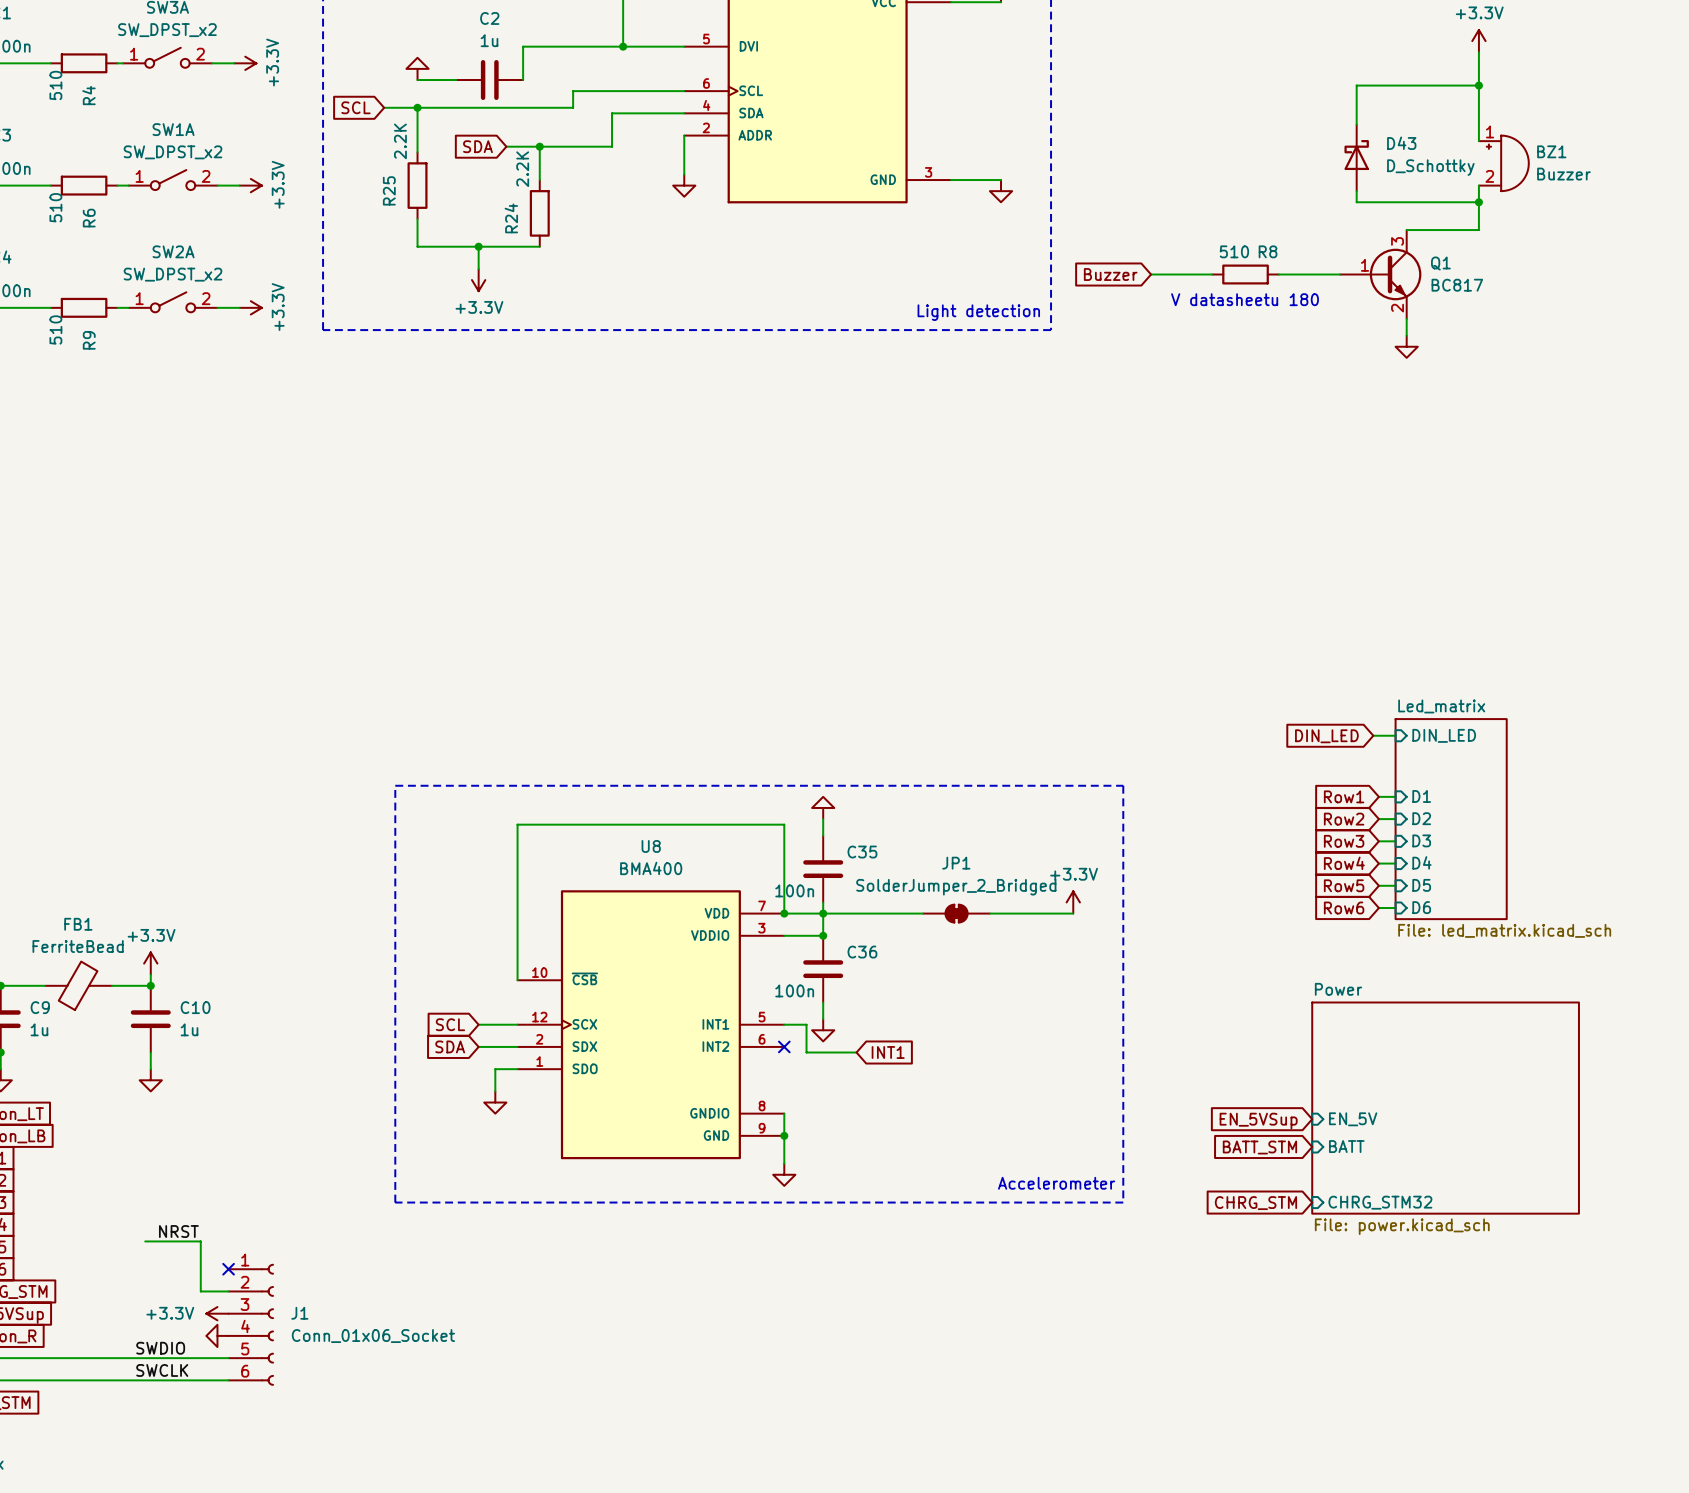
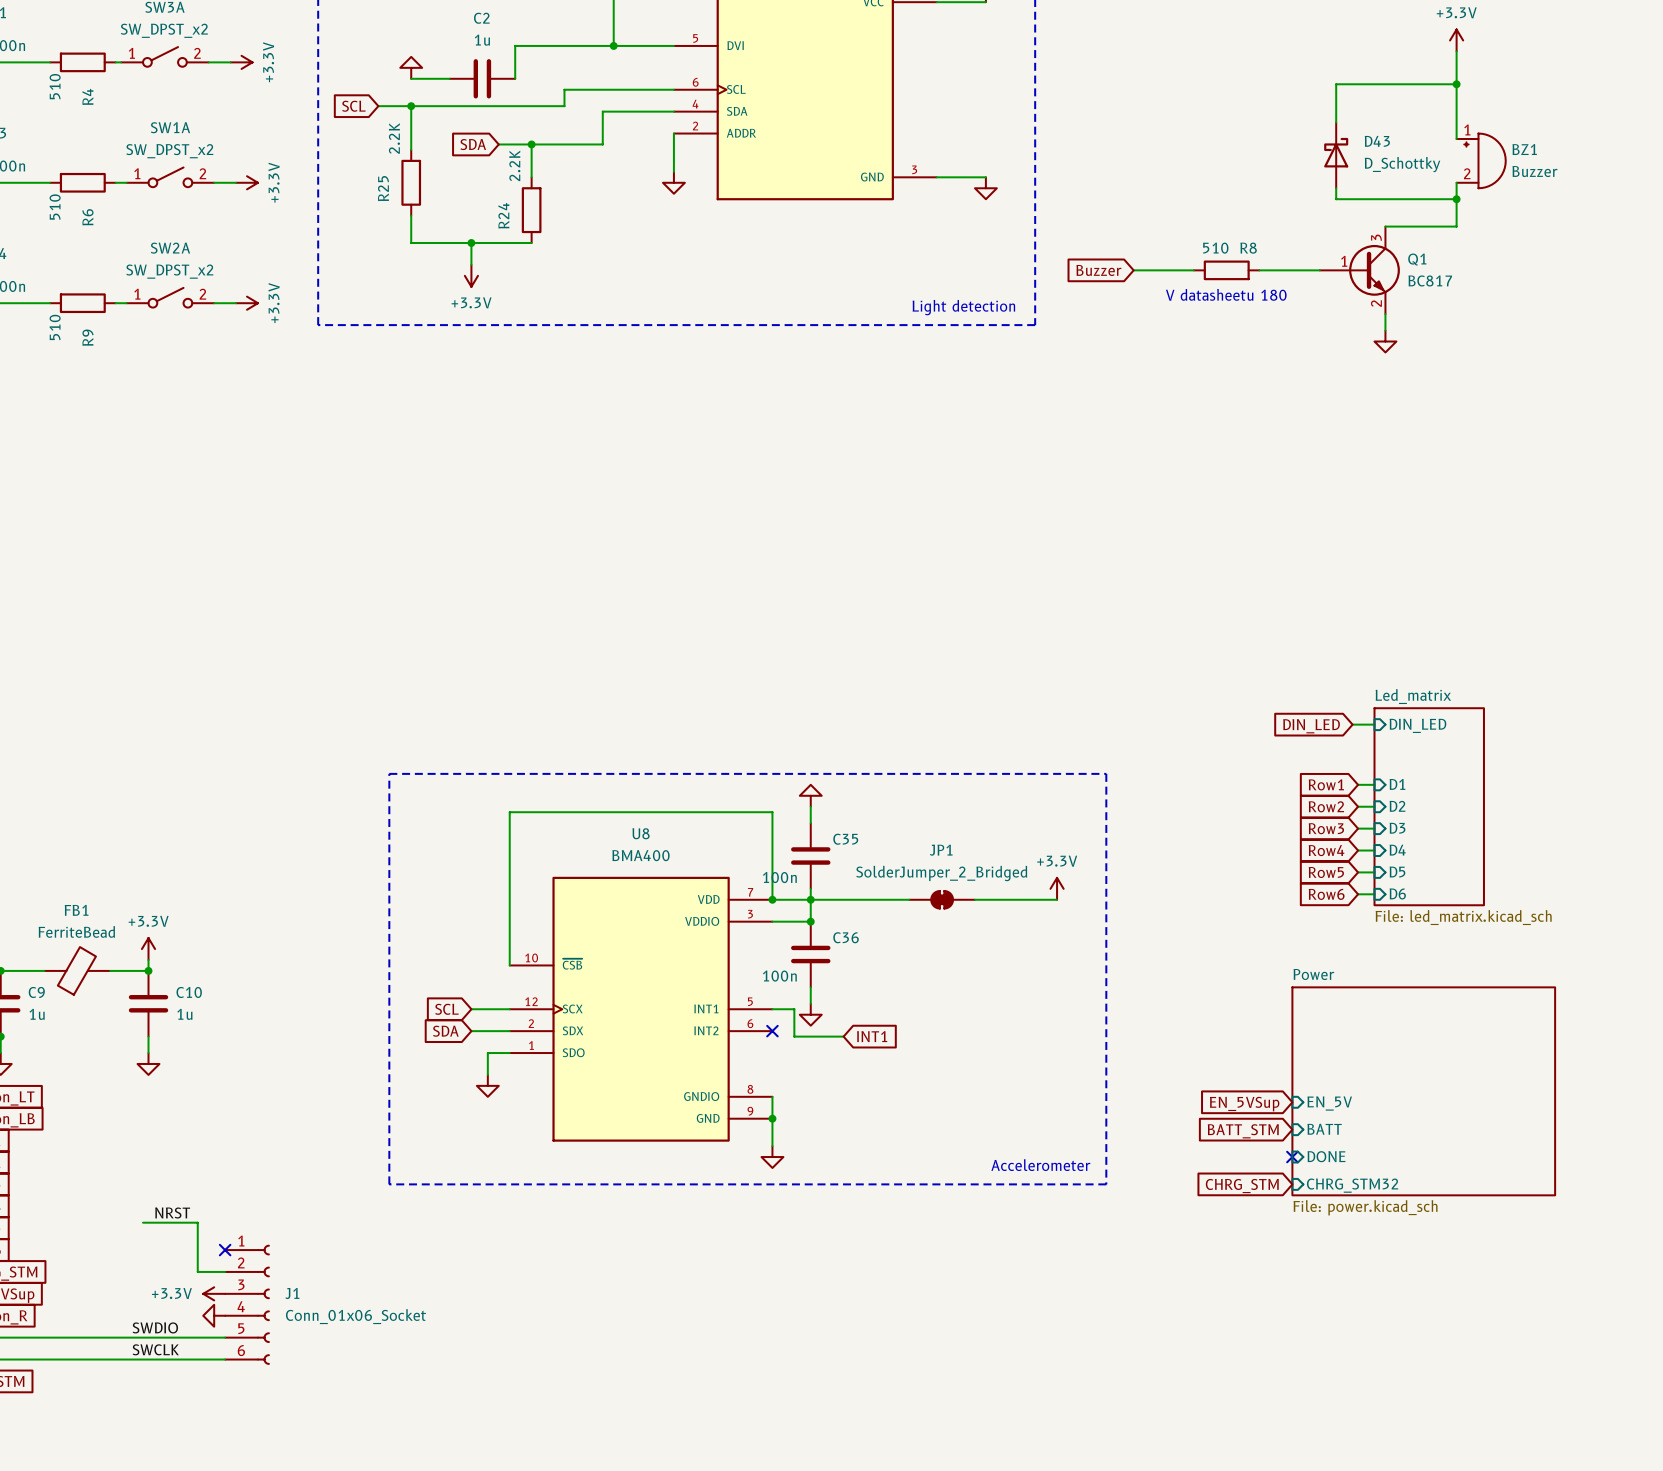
no-connect mark: none -> (1292, 1157)
sheet pin: none -> DONE (1326, 1156)

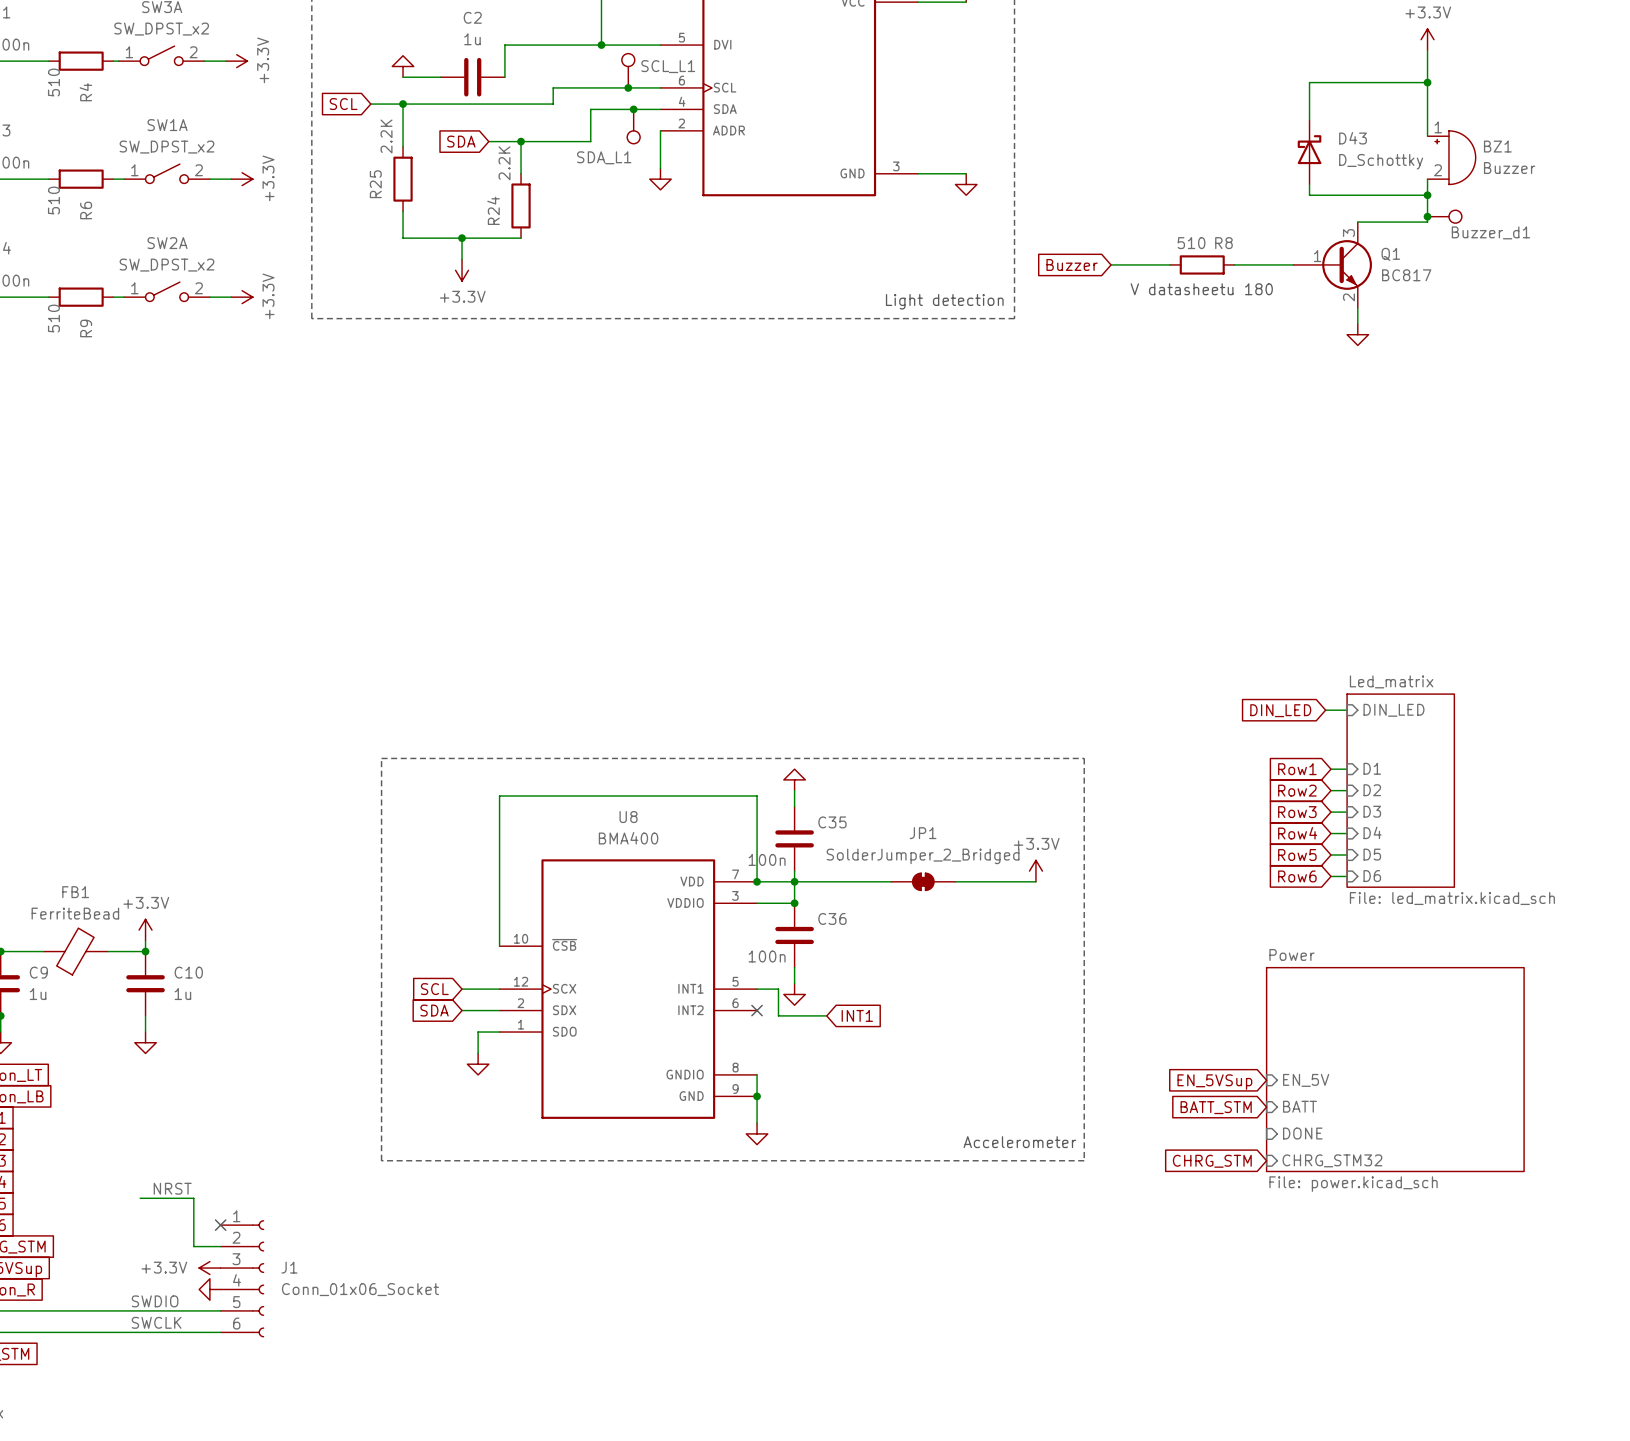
SCL_L1: none -> (628, 70)
junction: none -> (628, 87)
junction: none -> (633, 109)
SDA_L1: none -> (633, 126)
junction: none -> (1427, 216)
Buzzer_d1: none -> (1444, 216)
no-connect mark: (1292, 1157) -> none

